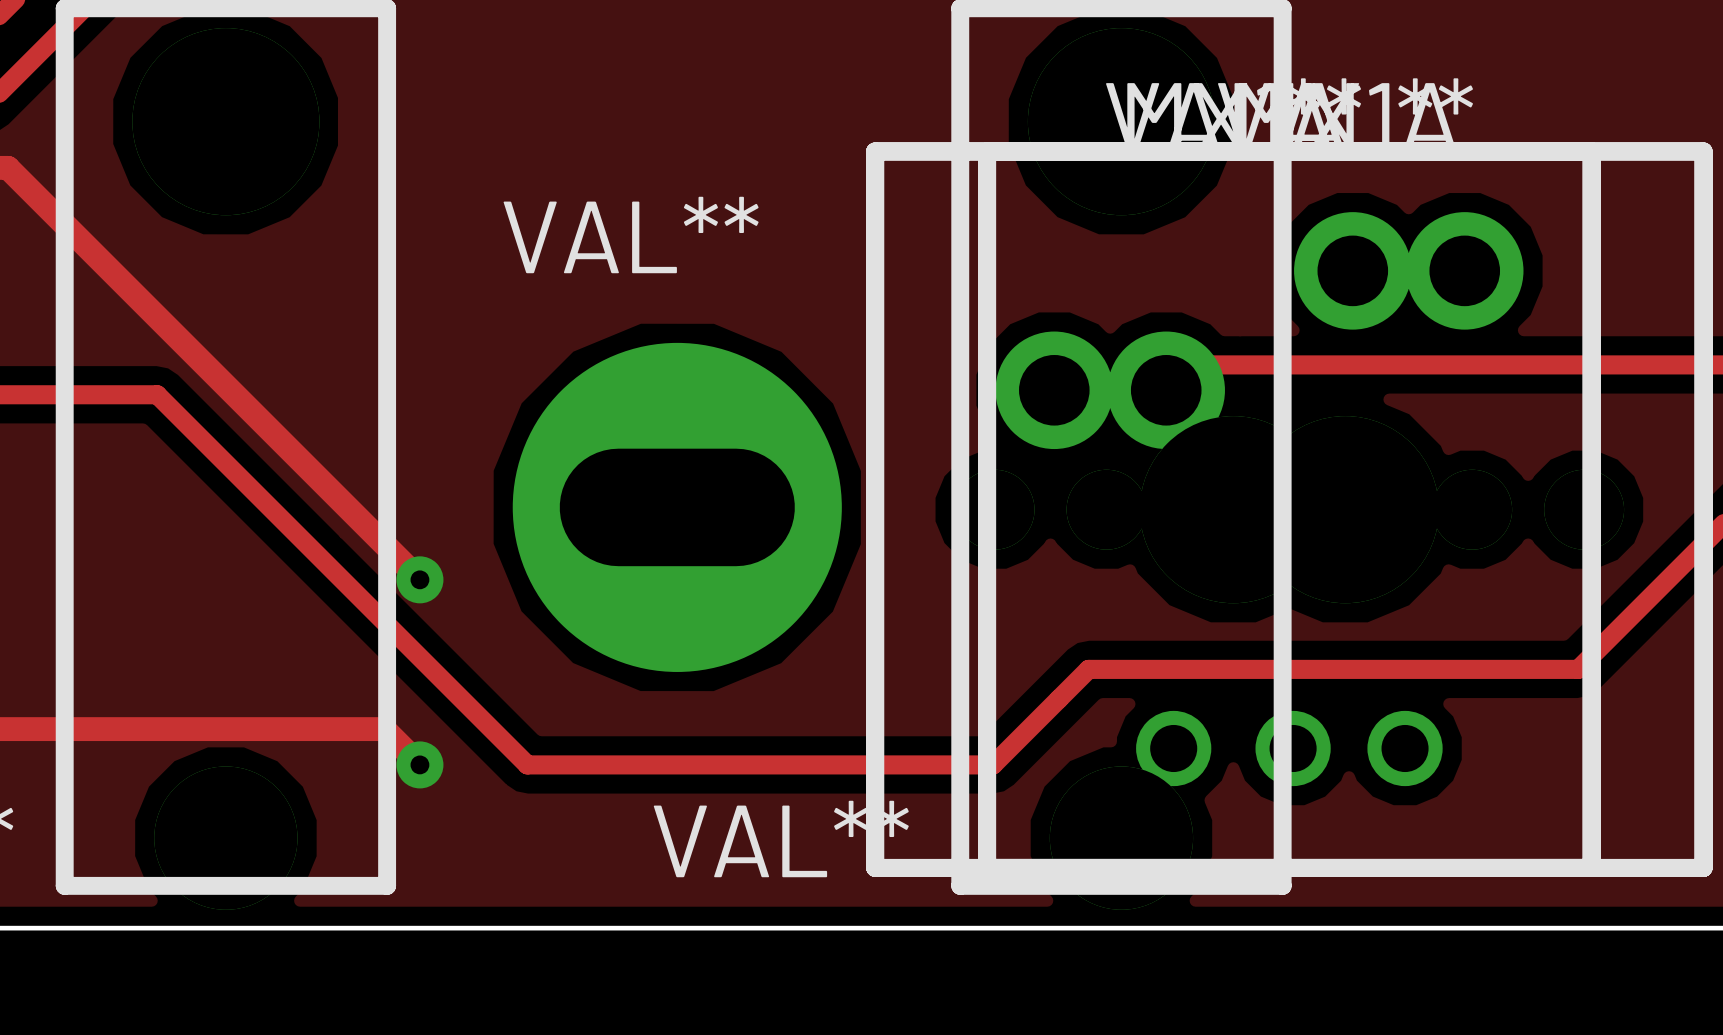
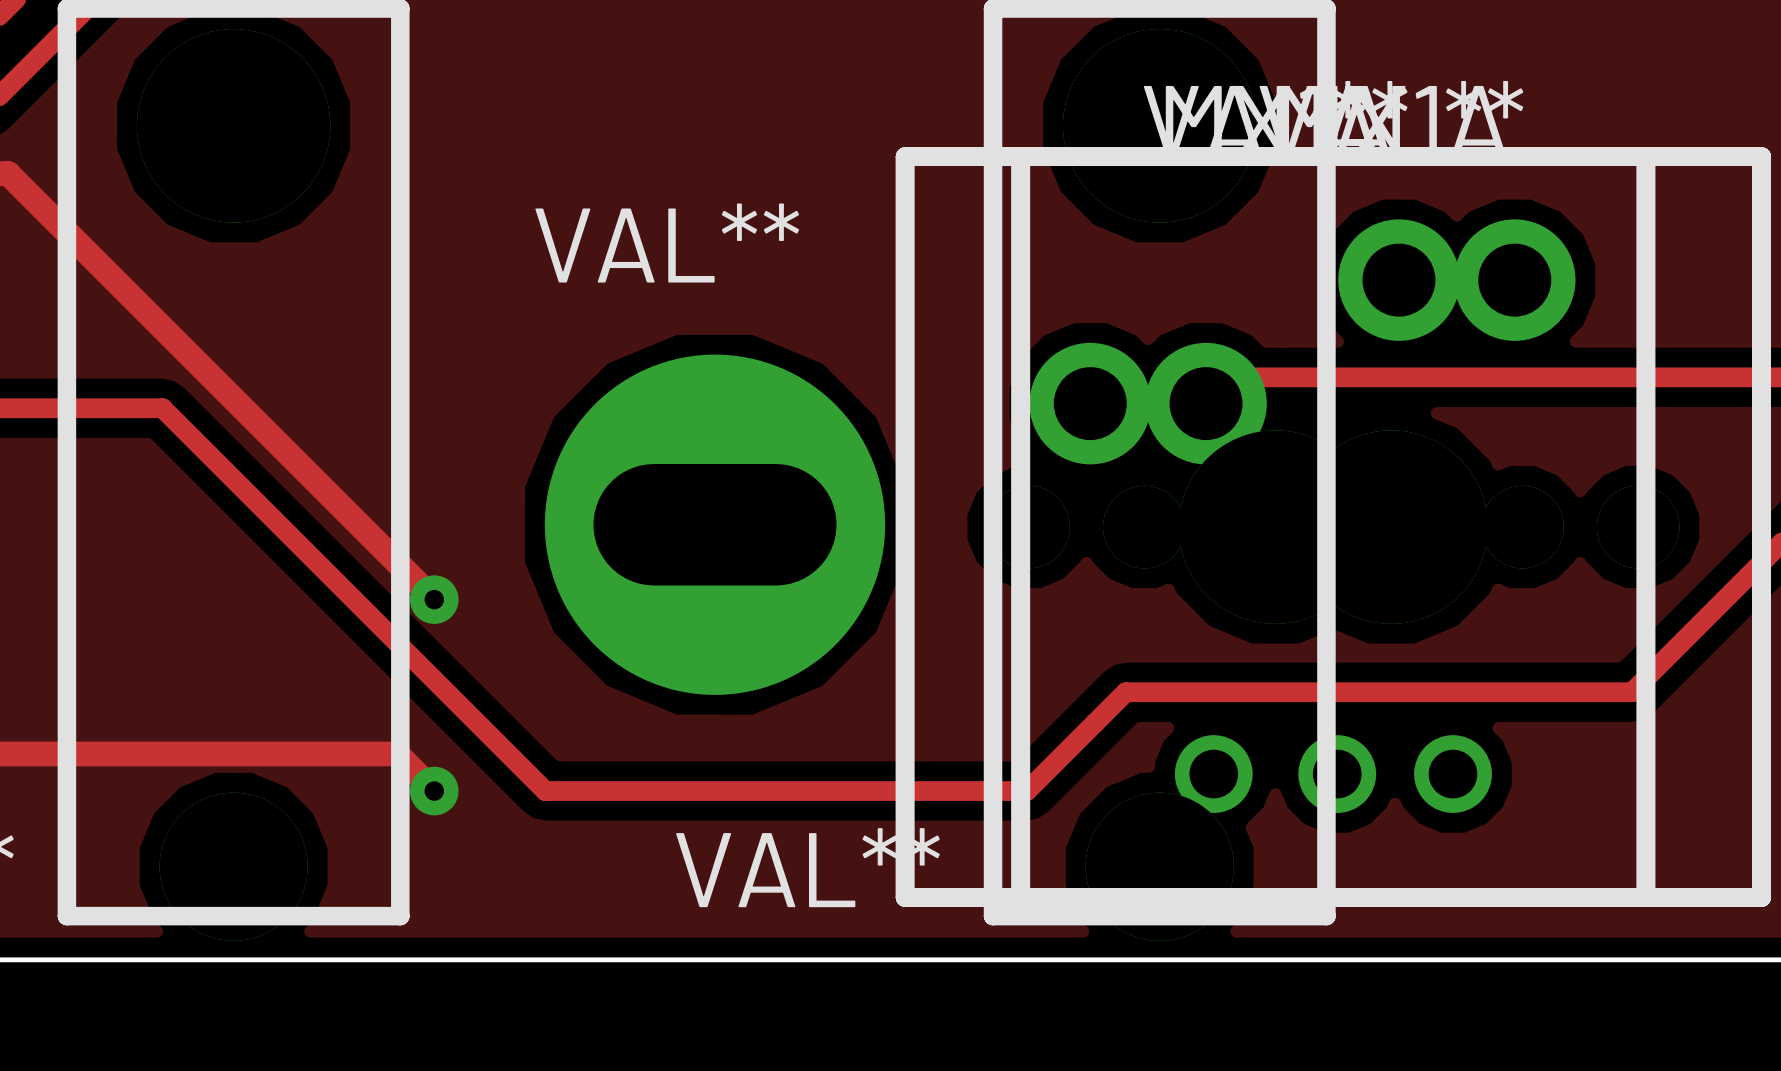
part position: (677, 507) -> (715, 524)

